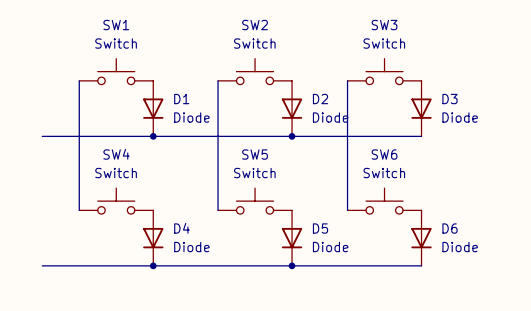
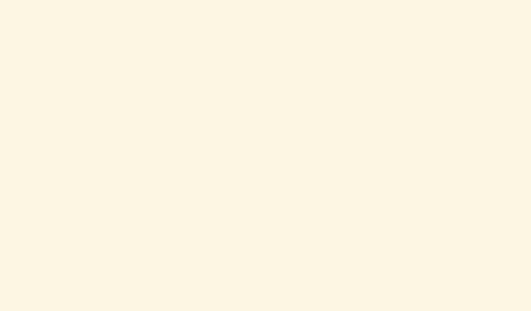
SW1: Switch (116, 71) -> none
SW2: Switch (255, 71) -> none
SW3: Switch (384, 71) -> none
wire: (79, 80) (79, 210) -> none
wire: (218, 80) (218, 210) -> none
wire: (347, 80) (347, 210) -> none
D1: Diode (153, 108) -> none
D2: Diode (292, 108) -> none
D3: Diode (421, 108) -> none
wire: (42, 136) (421, 136) -> none
junction: (153, 136) -> none
junction: (292, 136) -> none
SW4: Switch (116, 201) -> none
SW5: Switch (255, 201) -> none
SW6: Switch (384, 201) -> none
D4: Diode (153, 238) -> none
D5: Diode (292, 238) -> none
D6: Diode (421, 238) -> none
wire: (42, 265) (421, 265) -> none
junction: (153, 265) -> none
junction: (292, 265) -> none

